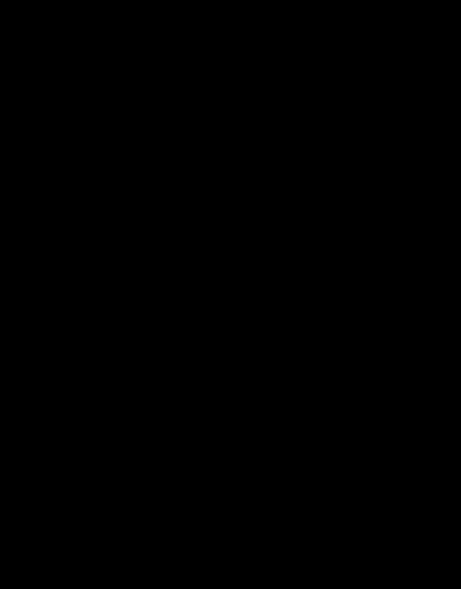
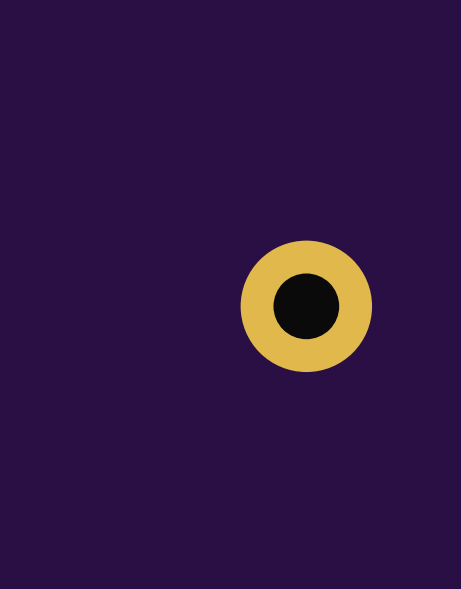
part: none -> (306, 306)

